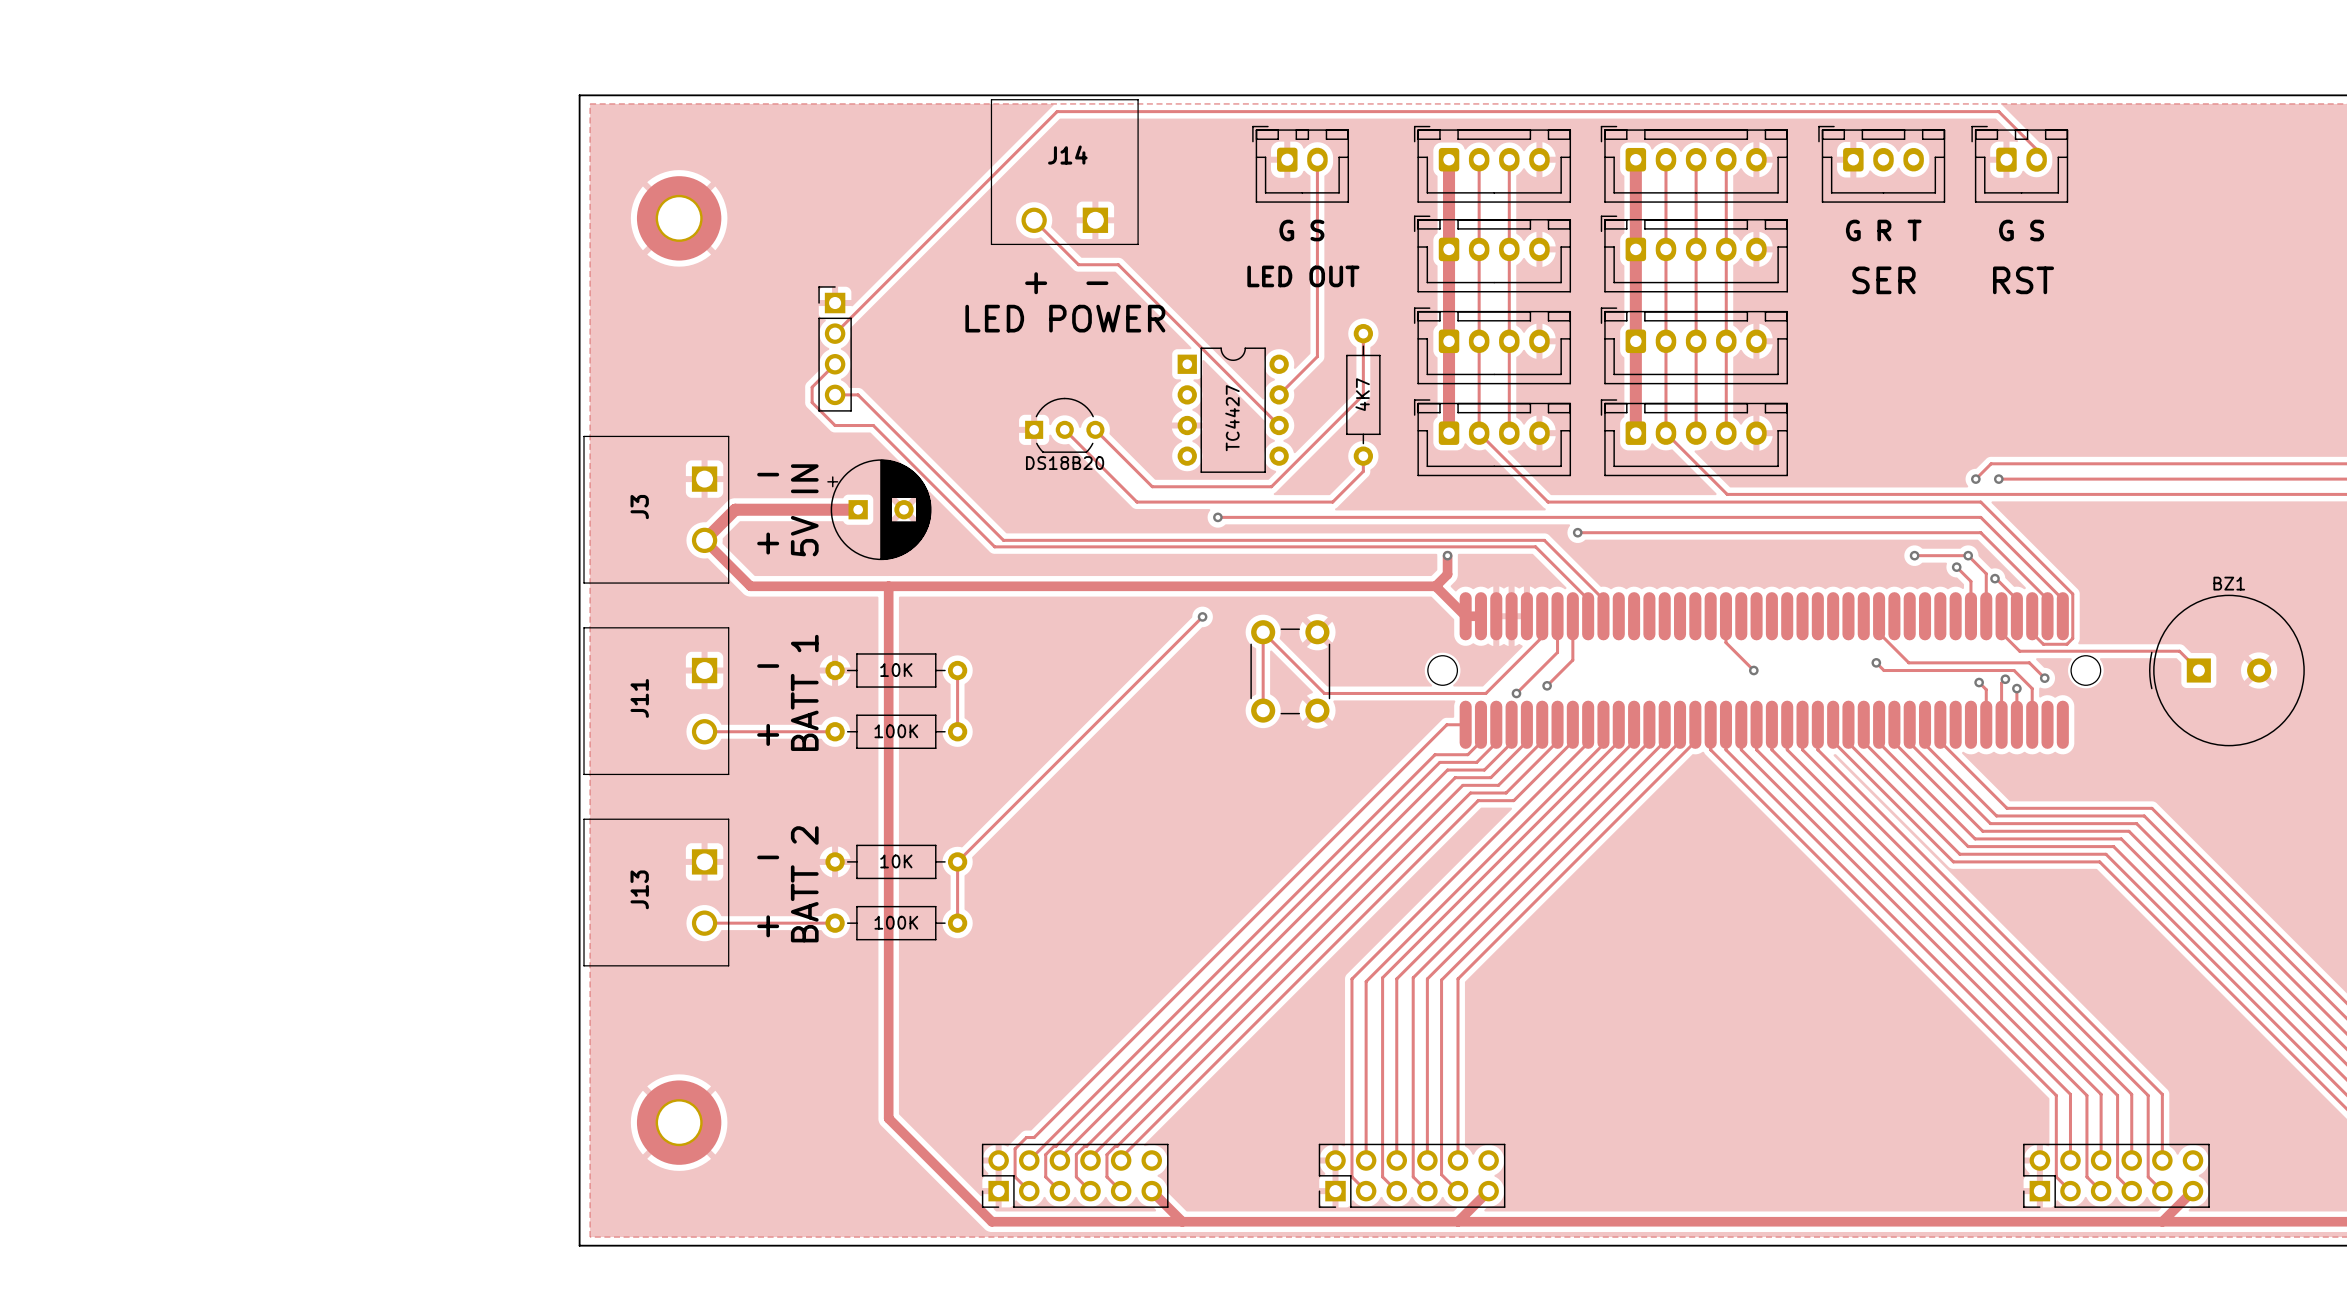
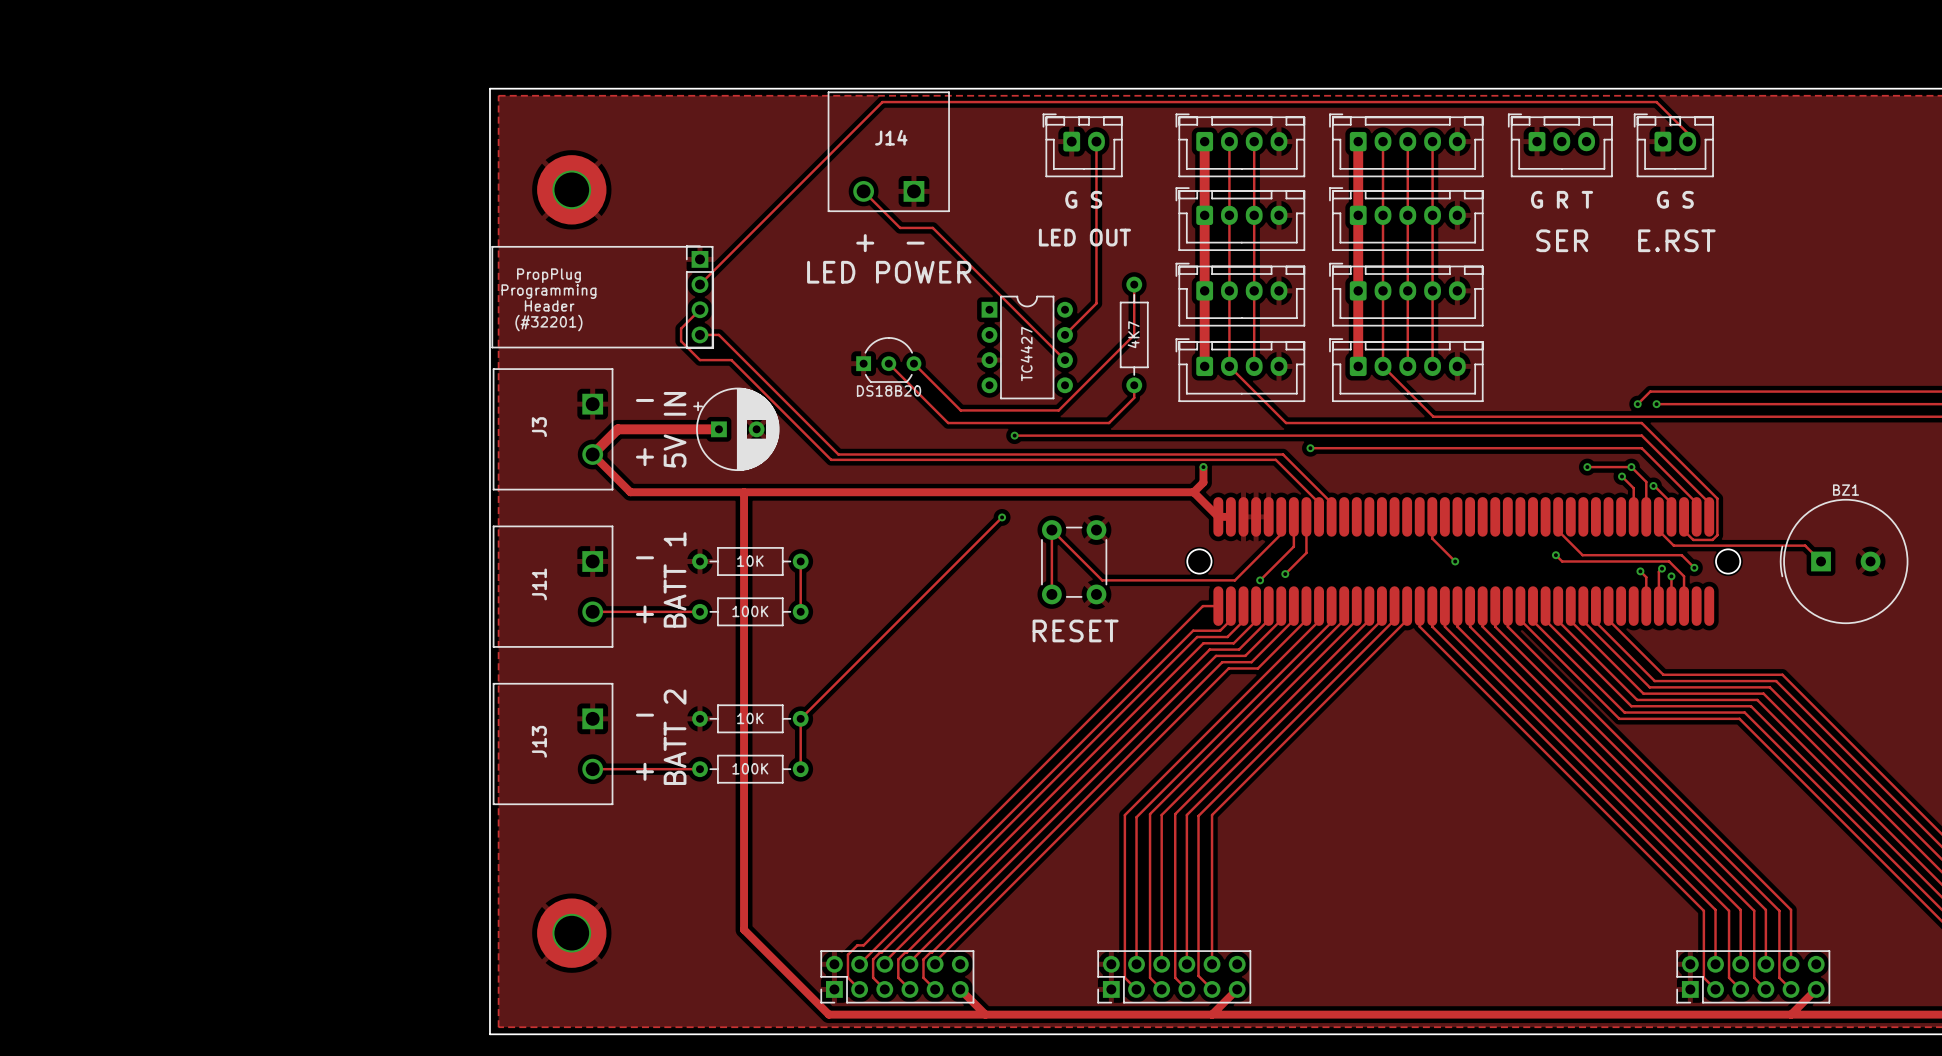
text: RST (2023, 280) -> E.RST (1676, 240)
line: none -> (492, 246) (712, 246) (712, 347) (492, 347) (492, 246)
text: none -> PropPlug (548, 275)
text: none -> Programming (548, 291)
text: none -> Header (549, 305)
text: none -> (#32201) (548, 323)
text: none -> RESET (1075, 630)

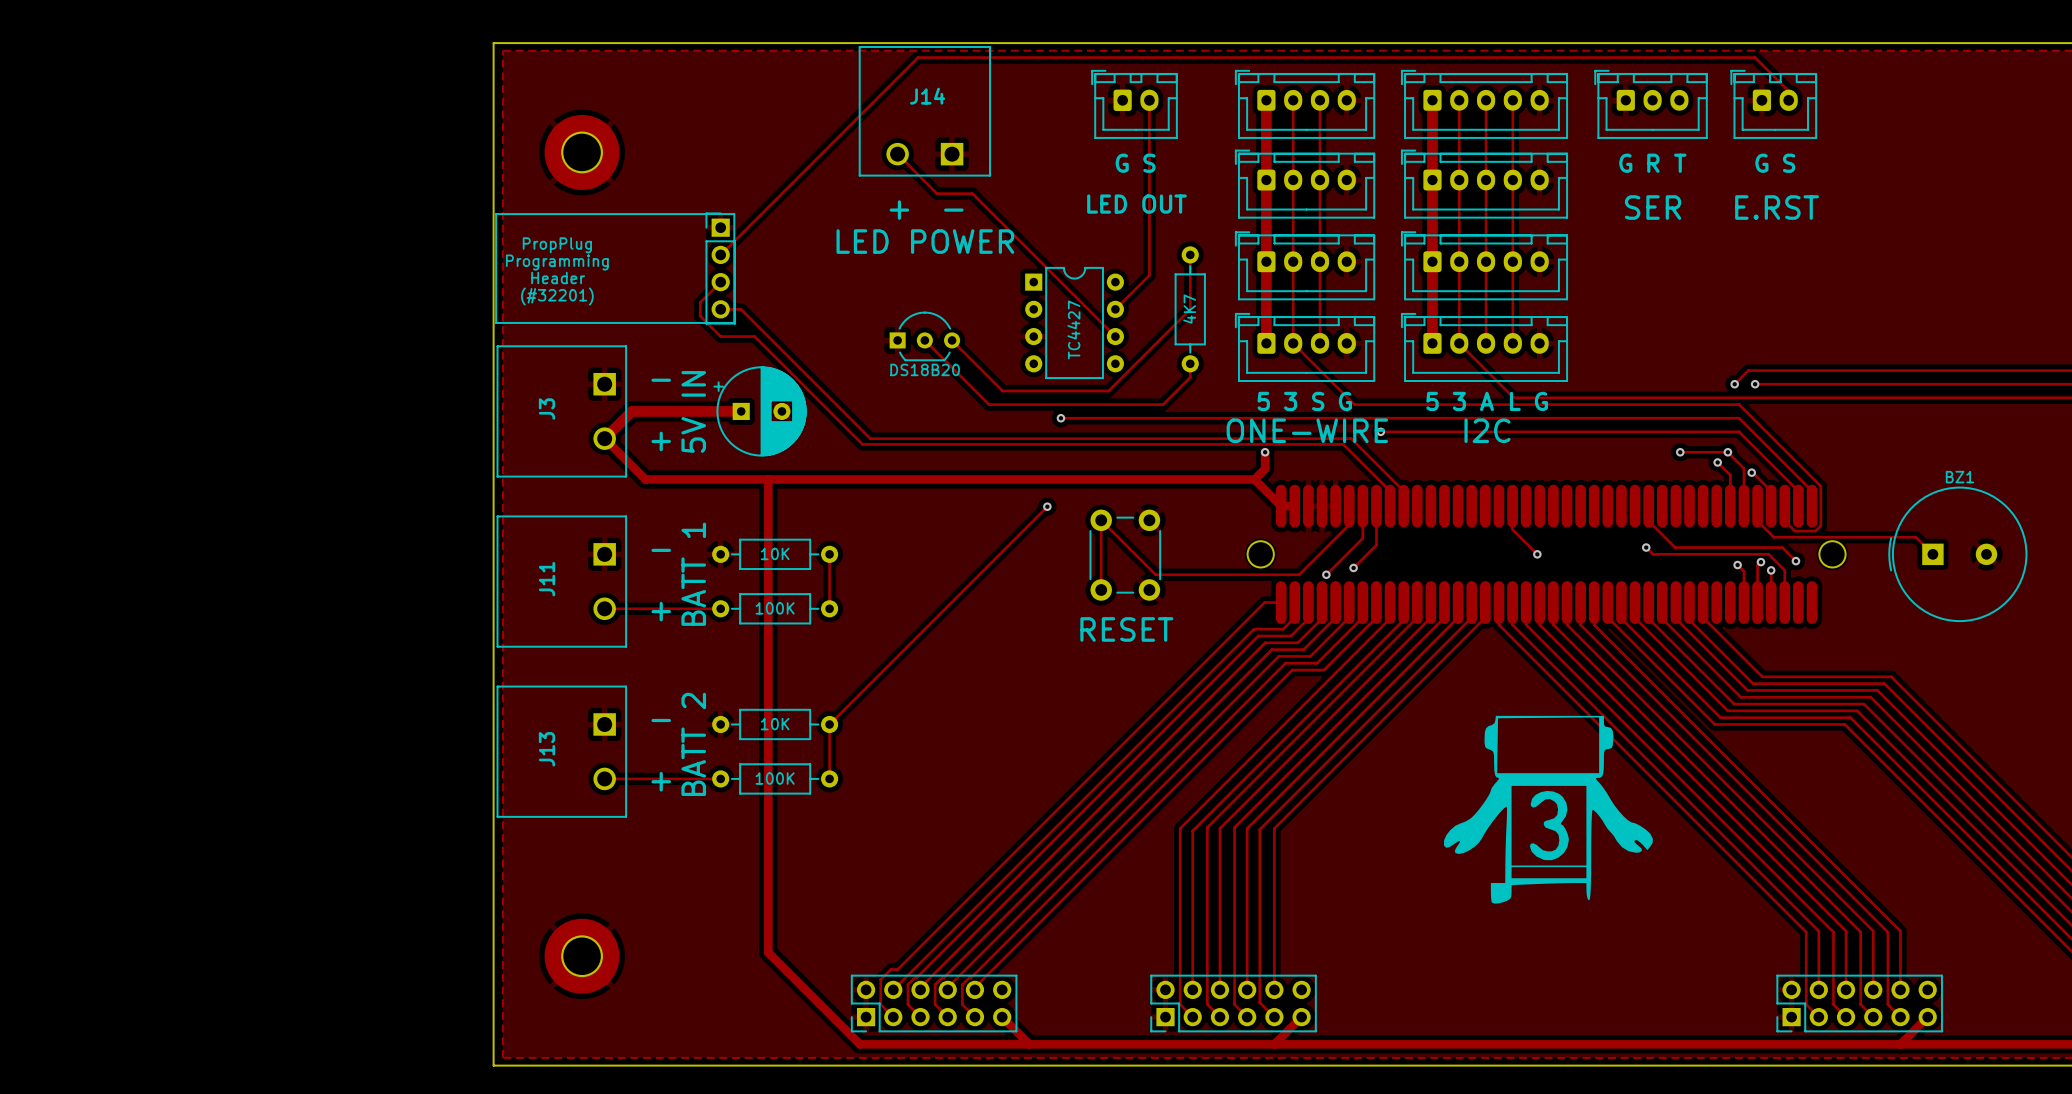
text: none -> 5 (1263, 401)
text: none -> 3 (1290, 401)
text: none -> S (1318, 401)
text: none -> G (1345, 401)
text: none -> 5 (1432, 401)
text: none -> 3 (1459, 401)
text: none -> A (1486, 401)
text: none -> L (1515, 401)
text: none -> G (1541, 401)
text: none -> ONE-WIRE (1307, 430)
text: none -> I2C (1487, 430)
drawing: none -> [1444, 715, 1653, 904]

